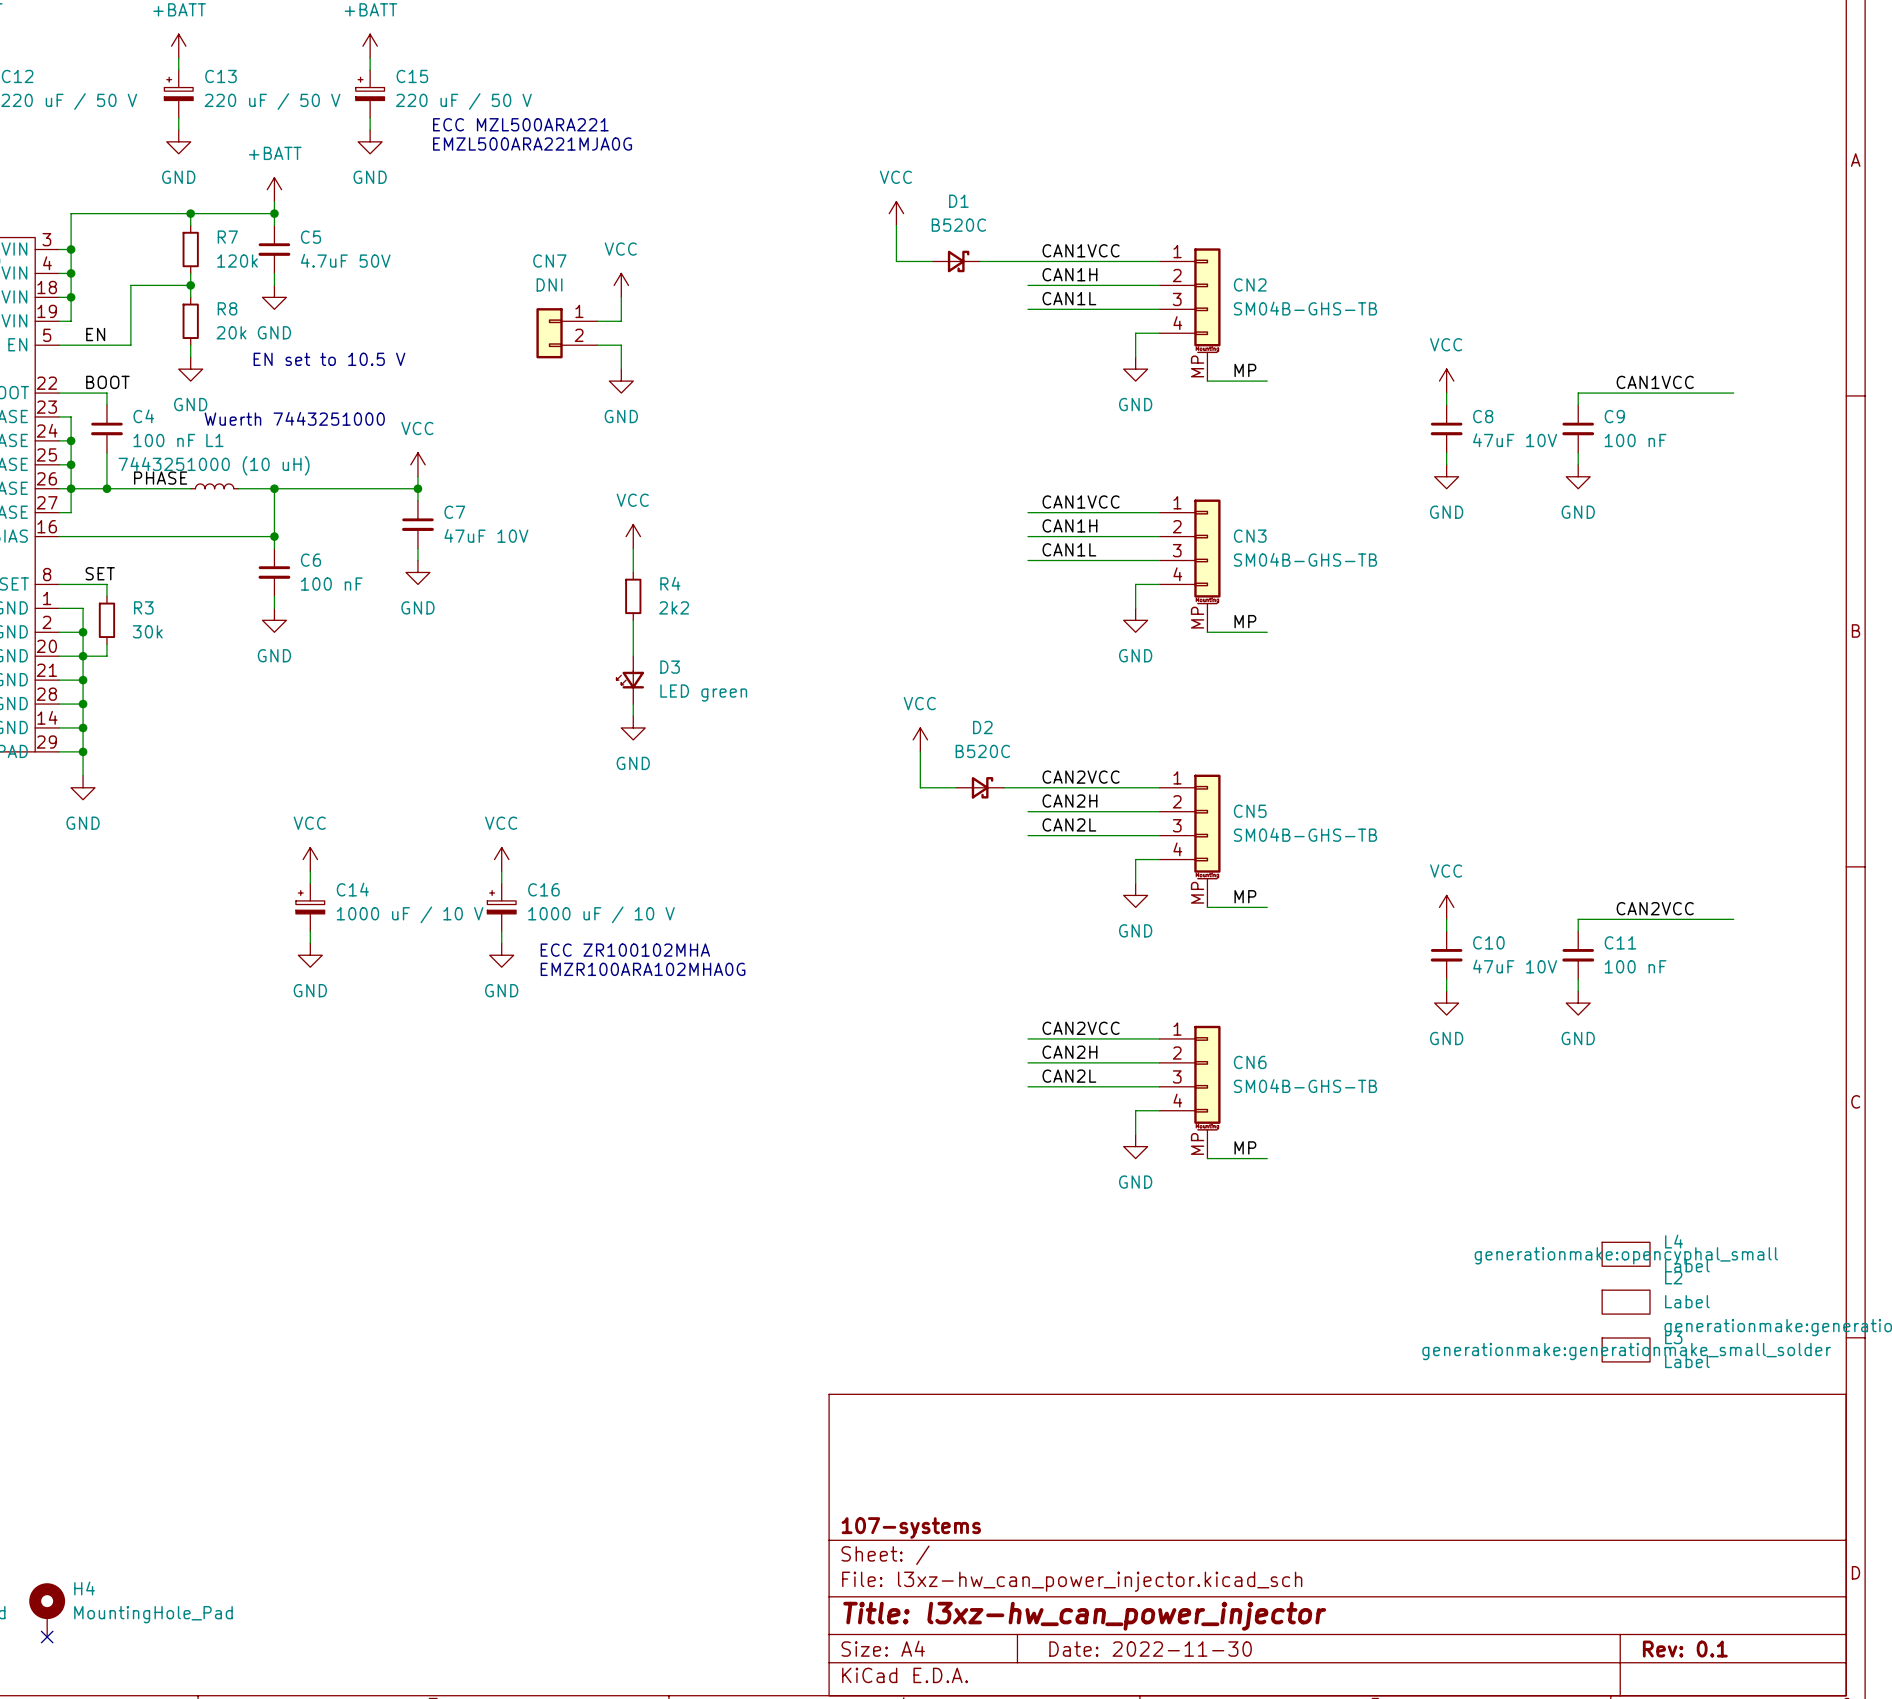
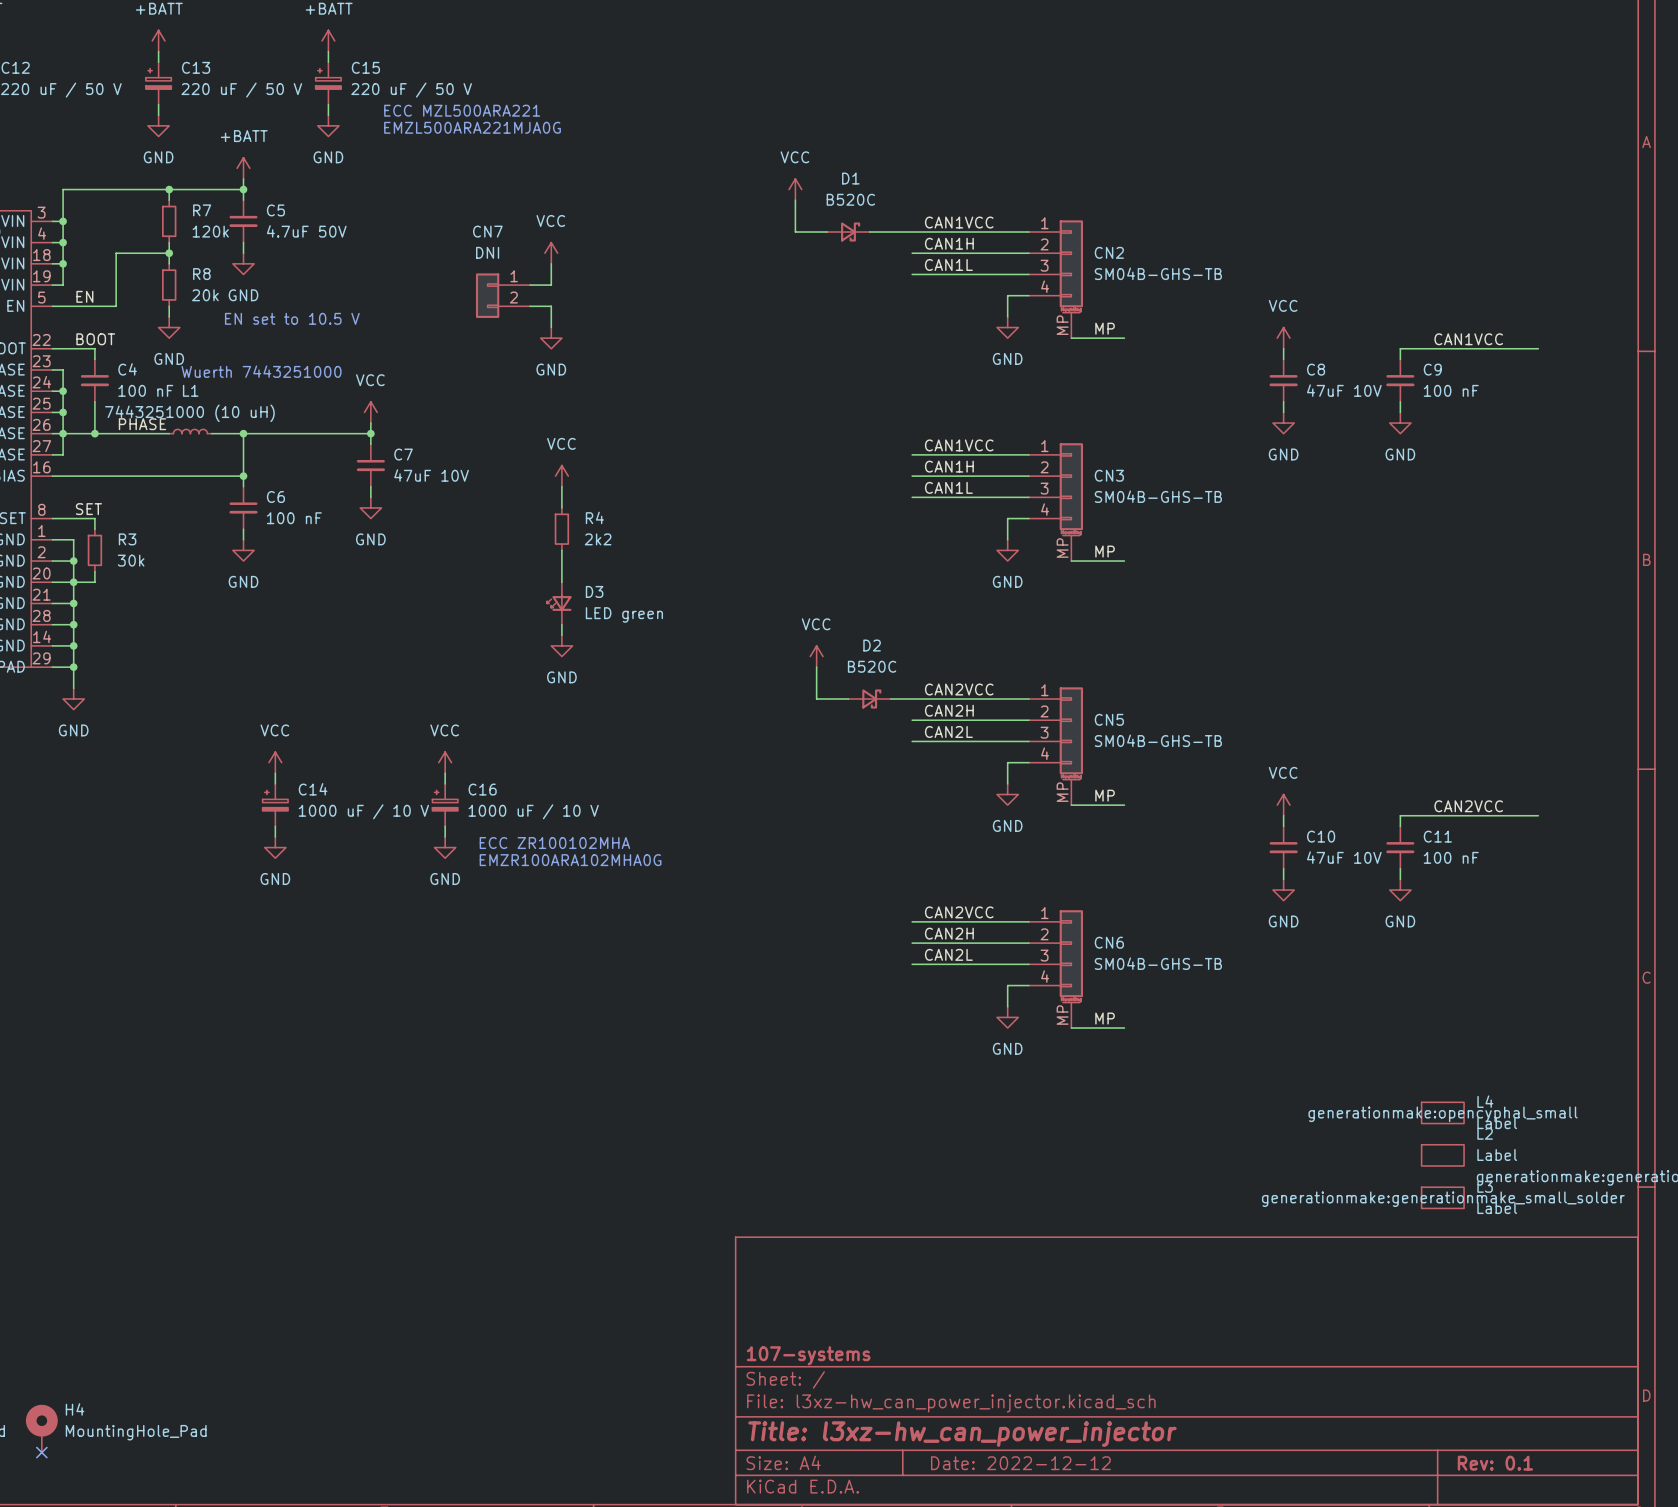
title block: Date: 2022-11-30 (1150, 1649) -> Date: 2022-12-12 (1020, 1463)

